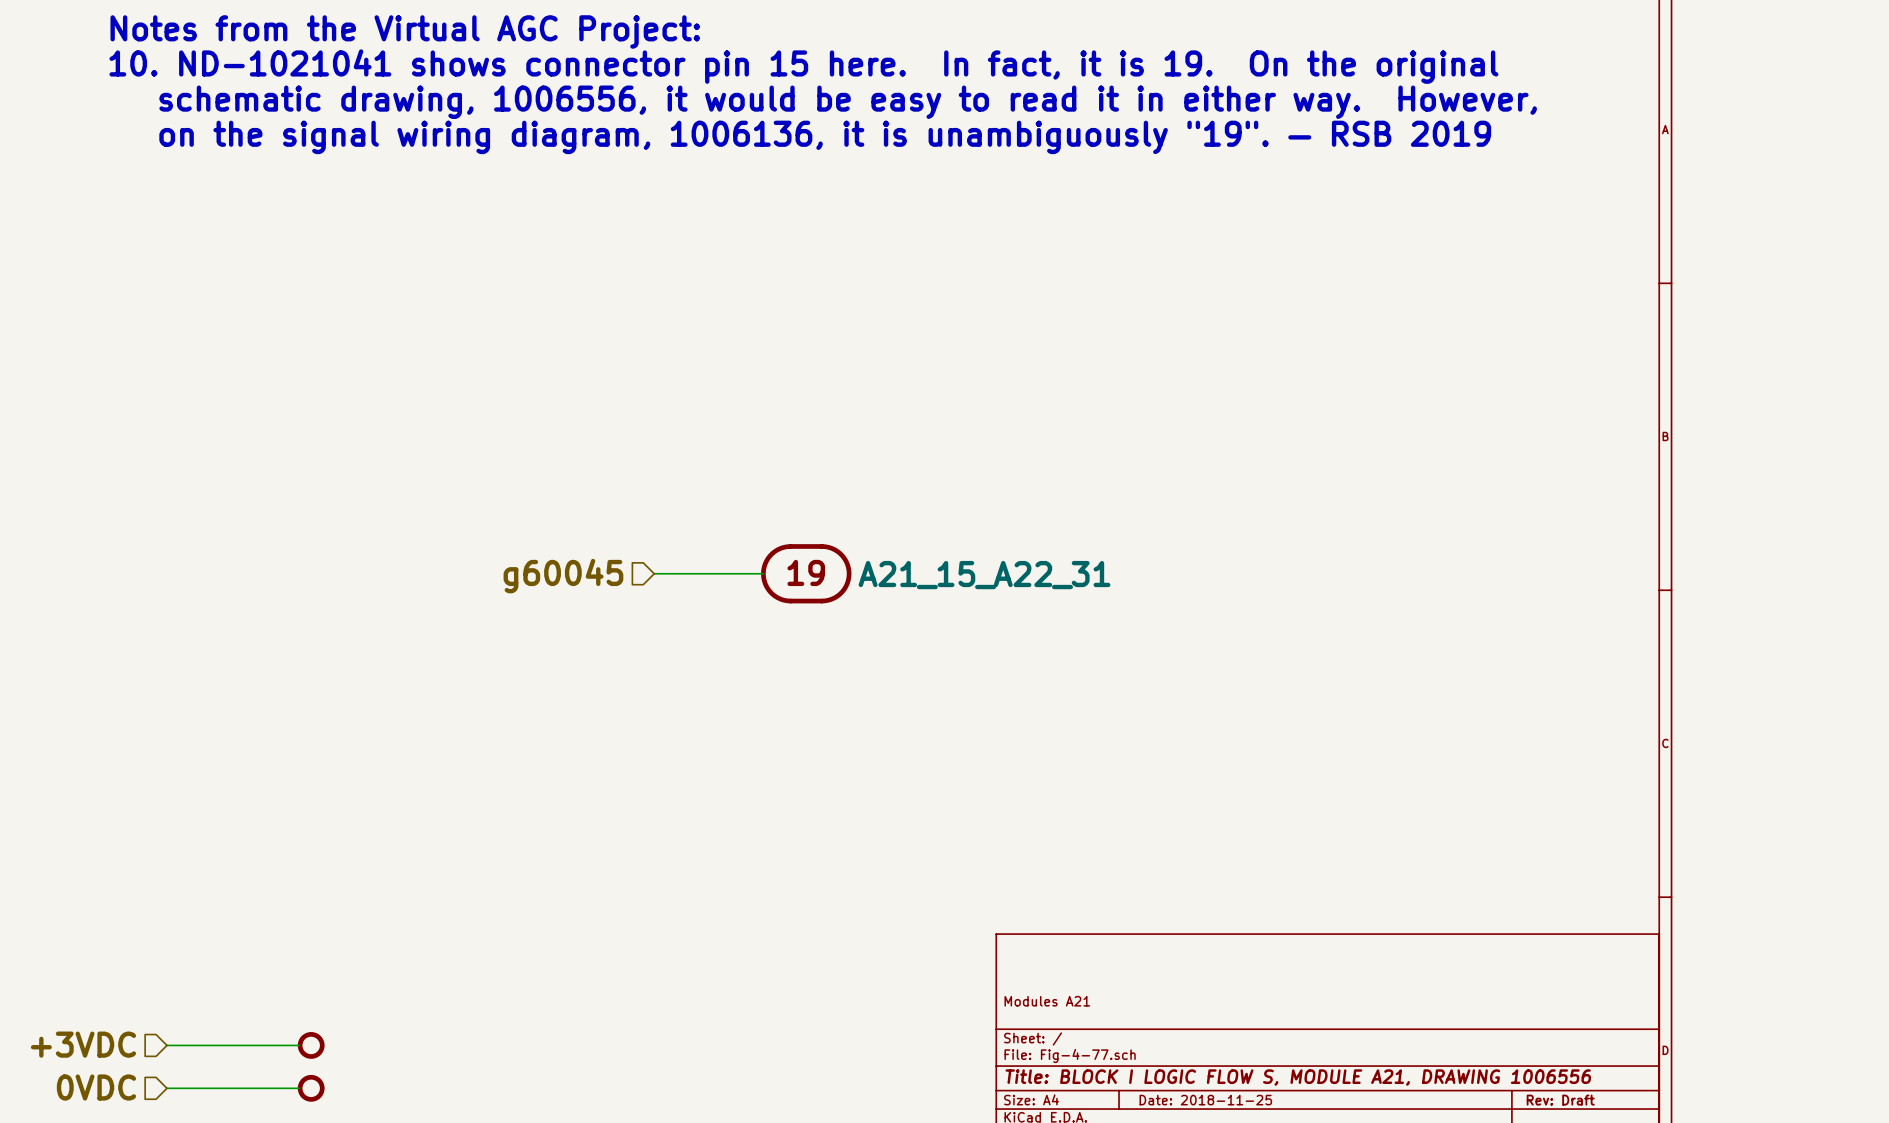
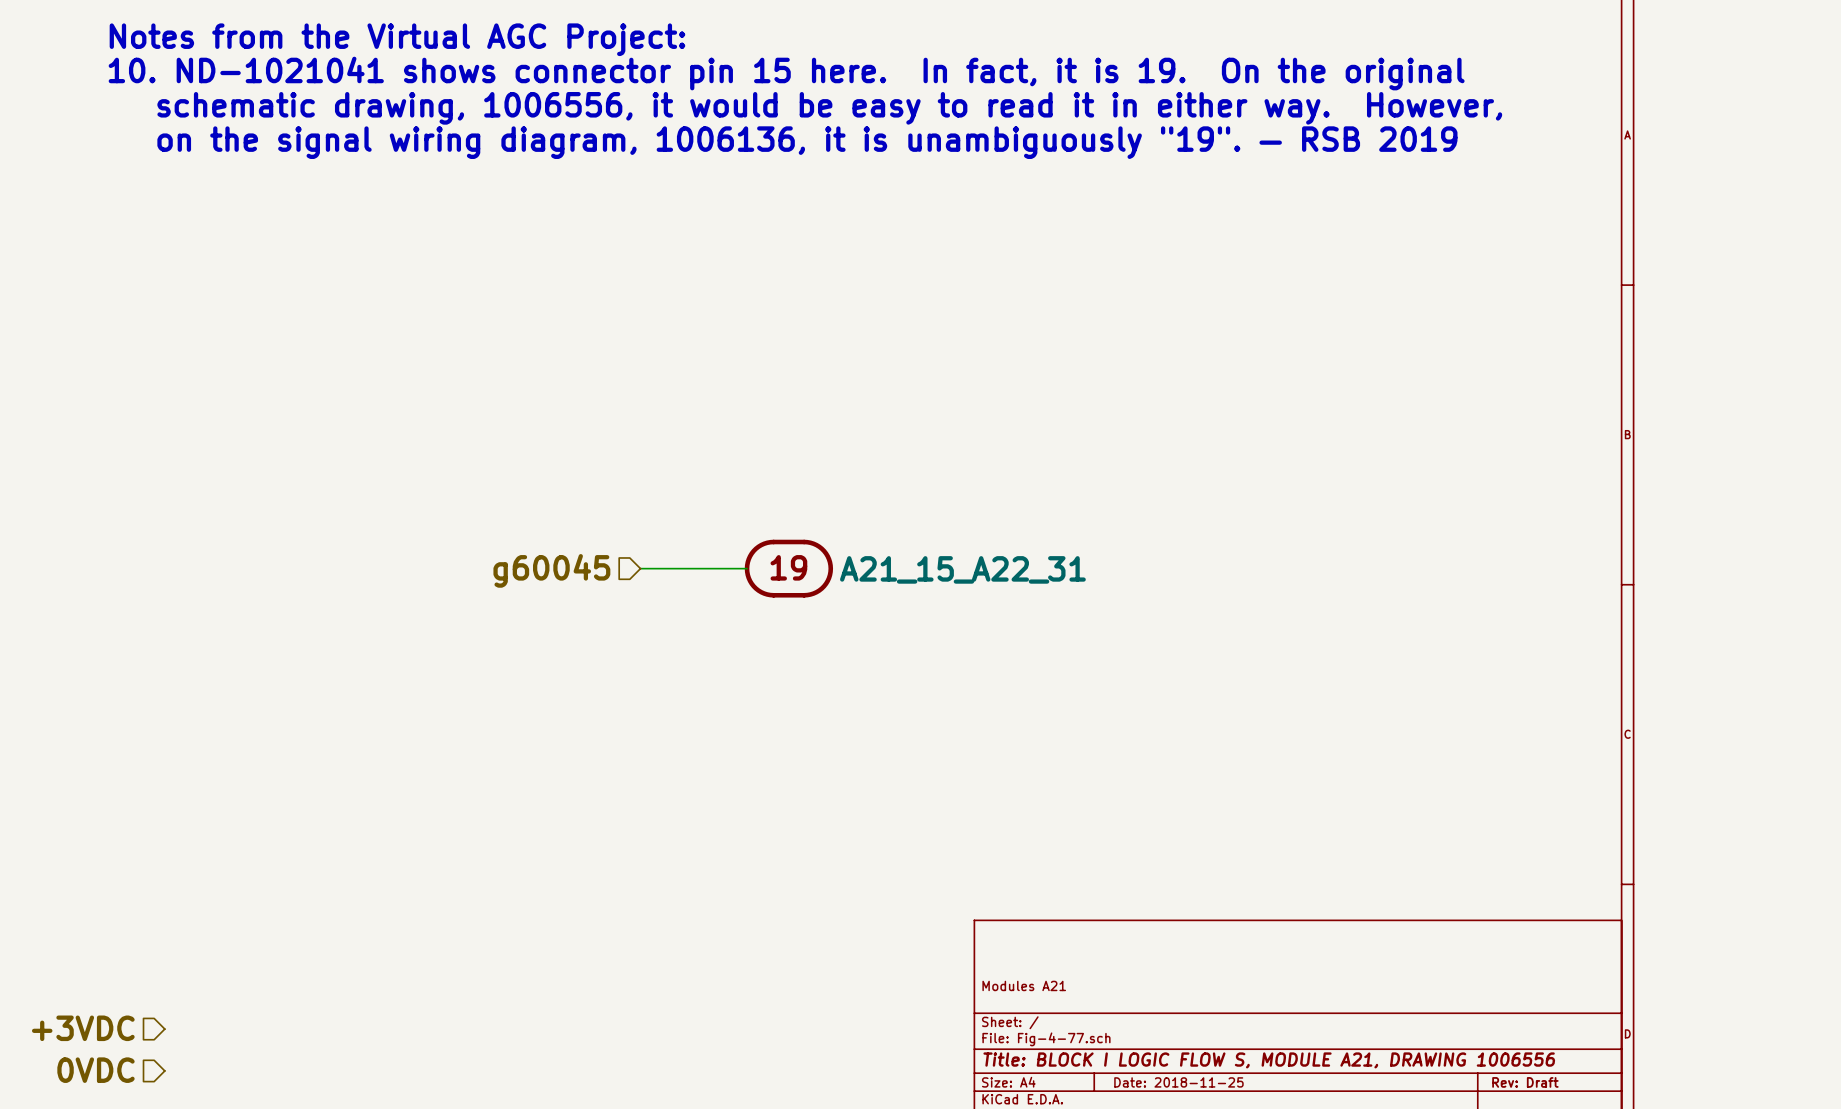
wire: (166, 1045) (299, 1045) -> none
part: (311, 1045) -> none
wire: (166, 1088) (299, 1088) -> none
part: (311, 1088) -> none

